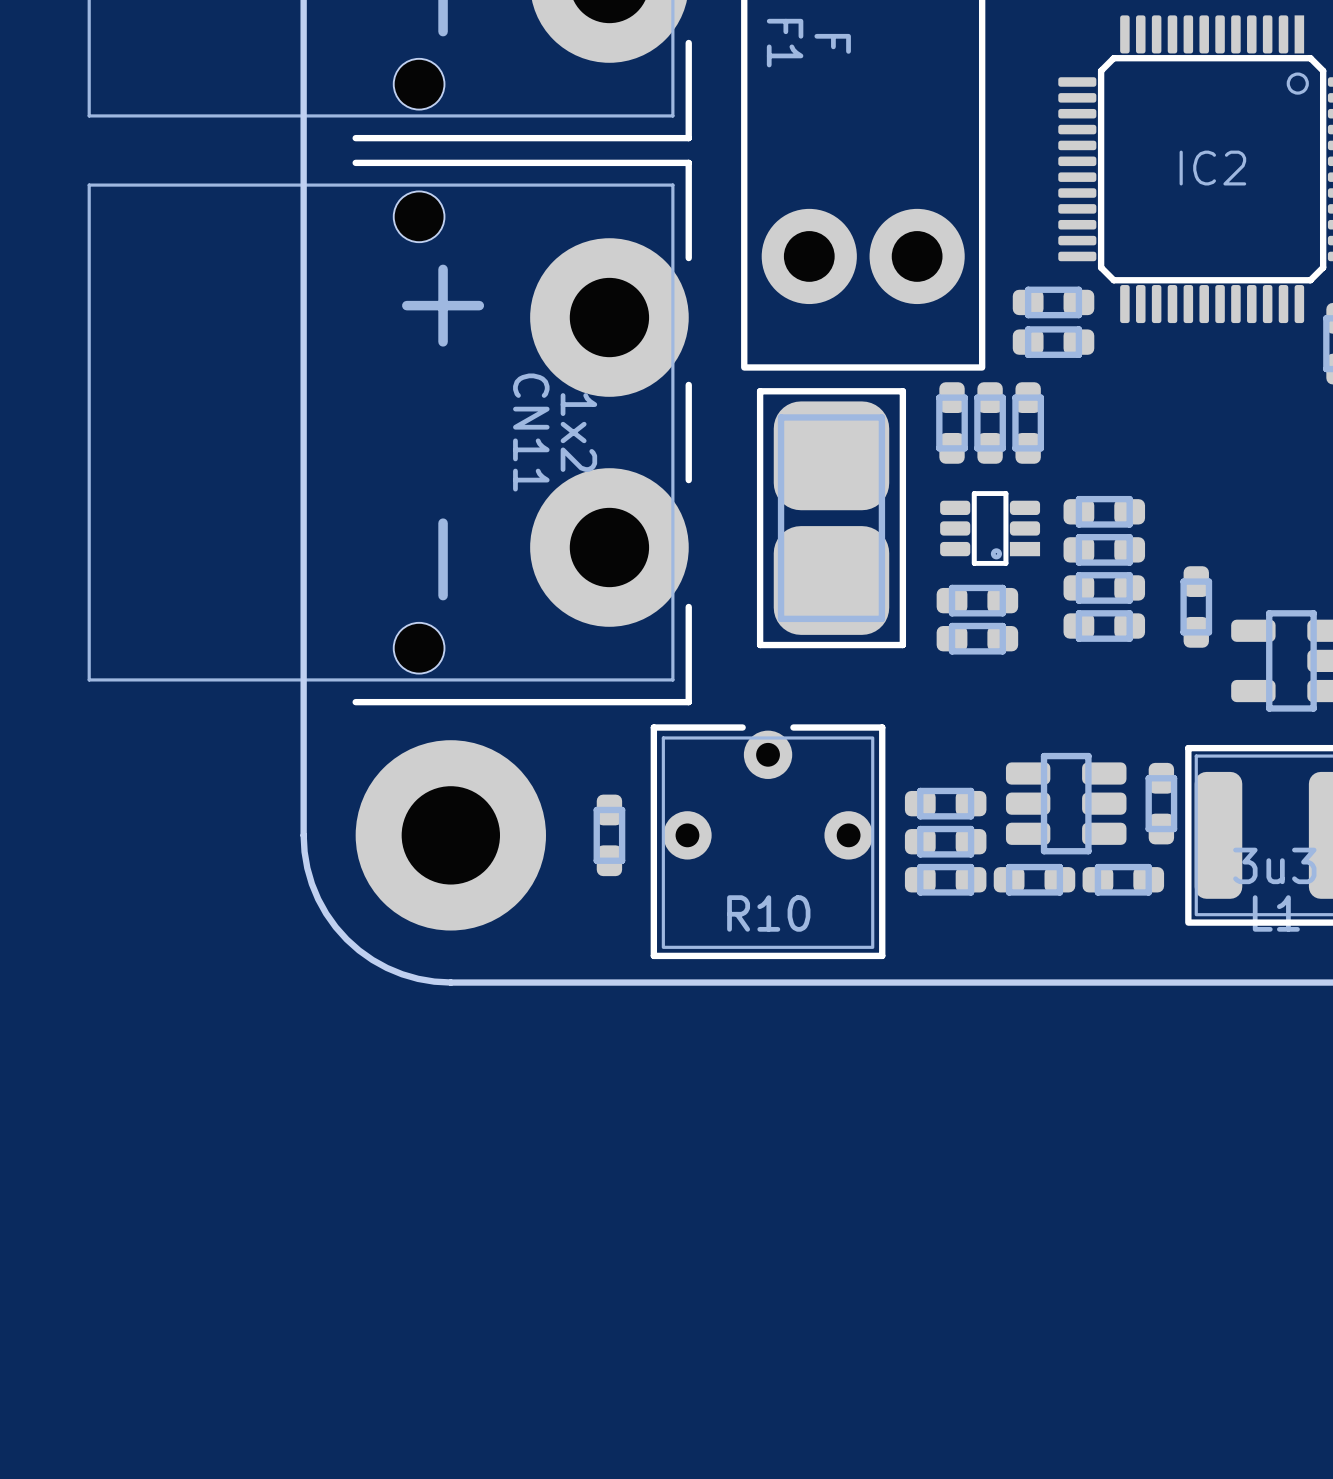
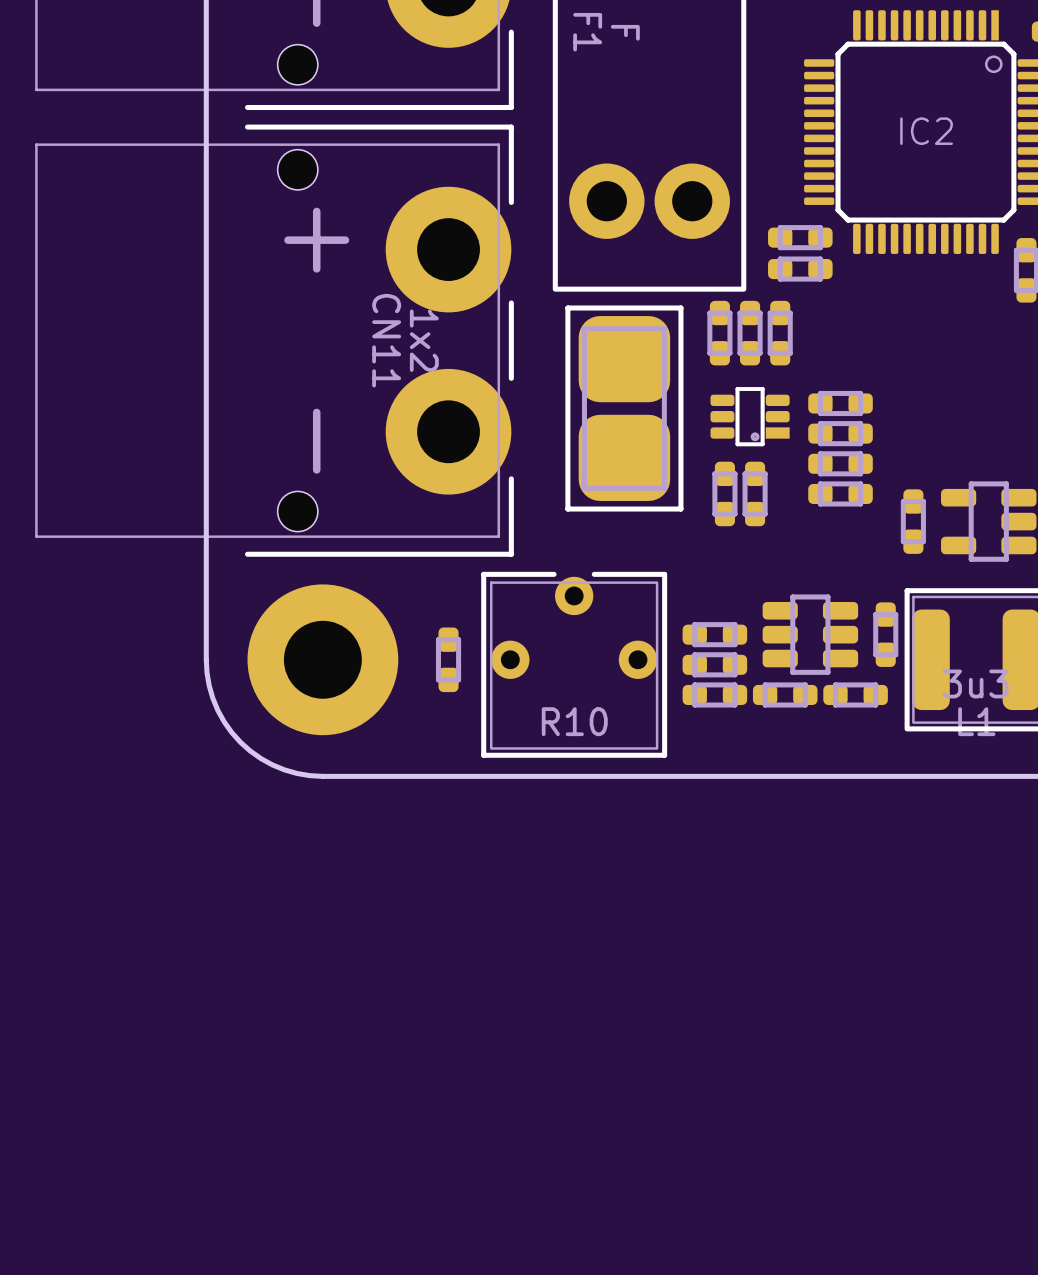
part: (977, 600) -> none
part position: (1196, 606) -> (913, 521)
part: none -> (724, 493)
part: none -> (755, 493)
part: (977, 638) -> none

